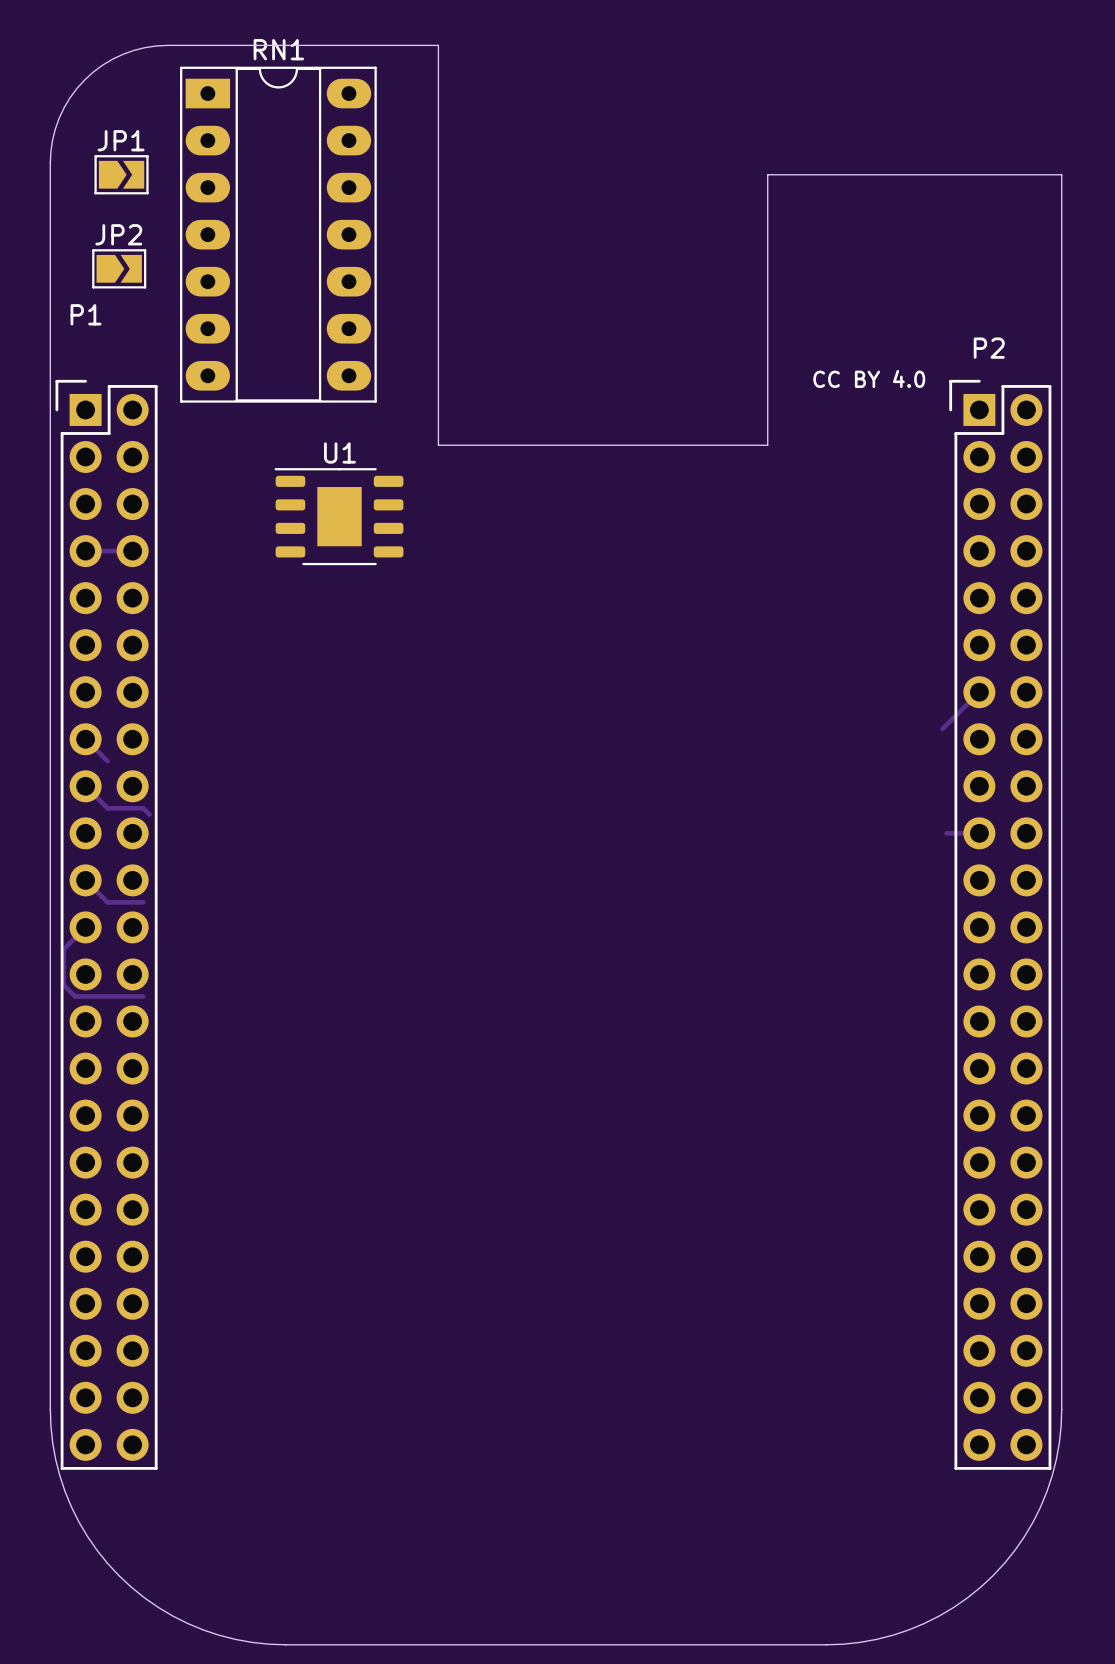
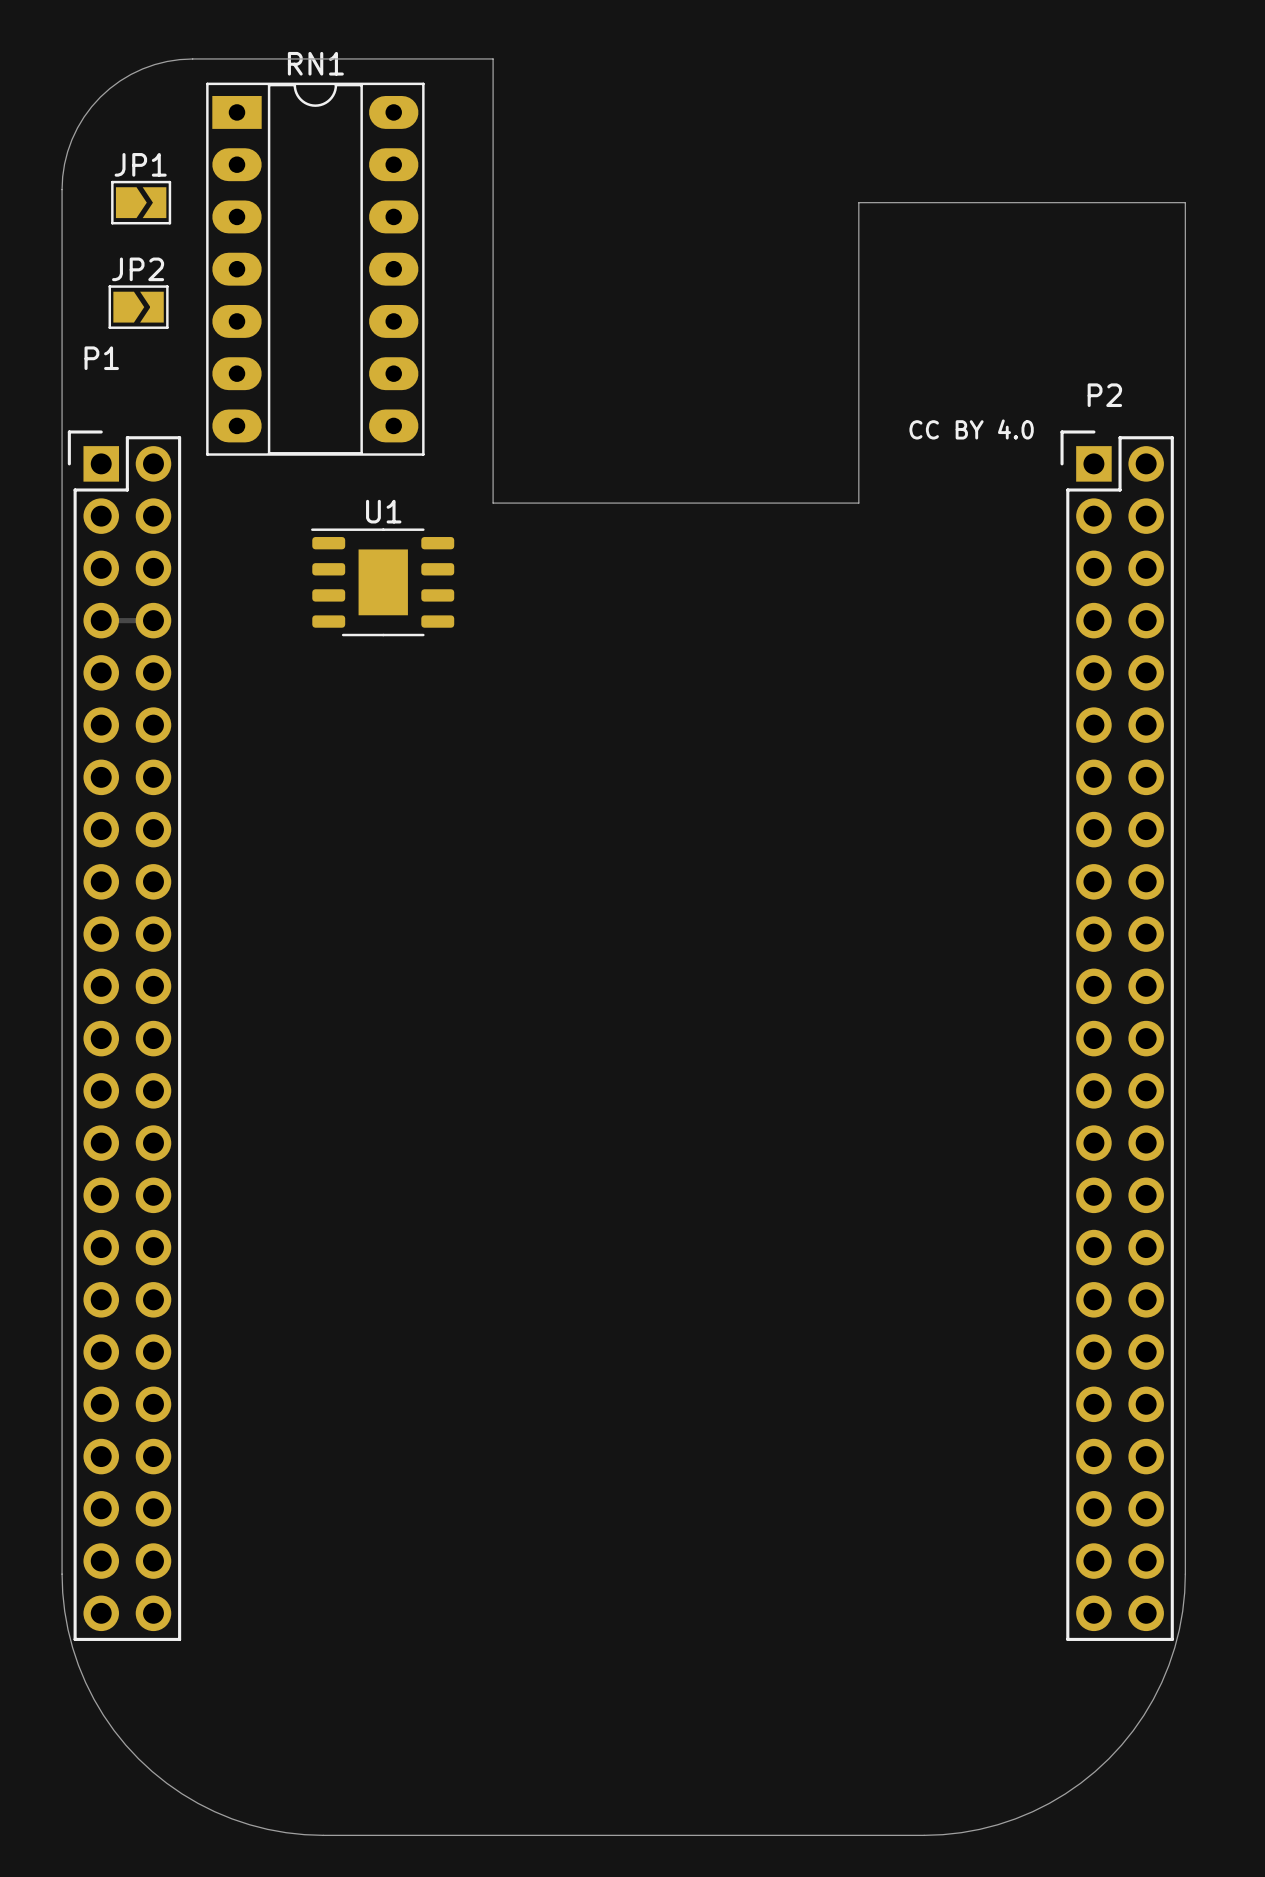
track: (979, 692) (942, 729) -> none
track: (85, 739) (107, 761) -> none
track: (85, 786) (107, 808) (143, 808) (149, 814) -> none
track: (946, 833) (979, 833) -> none
track: (85, 880) (107, 902) (143, 902) -> none
track: (85, 927) (63, 949) (63, 985) (75, 996) (143, 996) -> none

